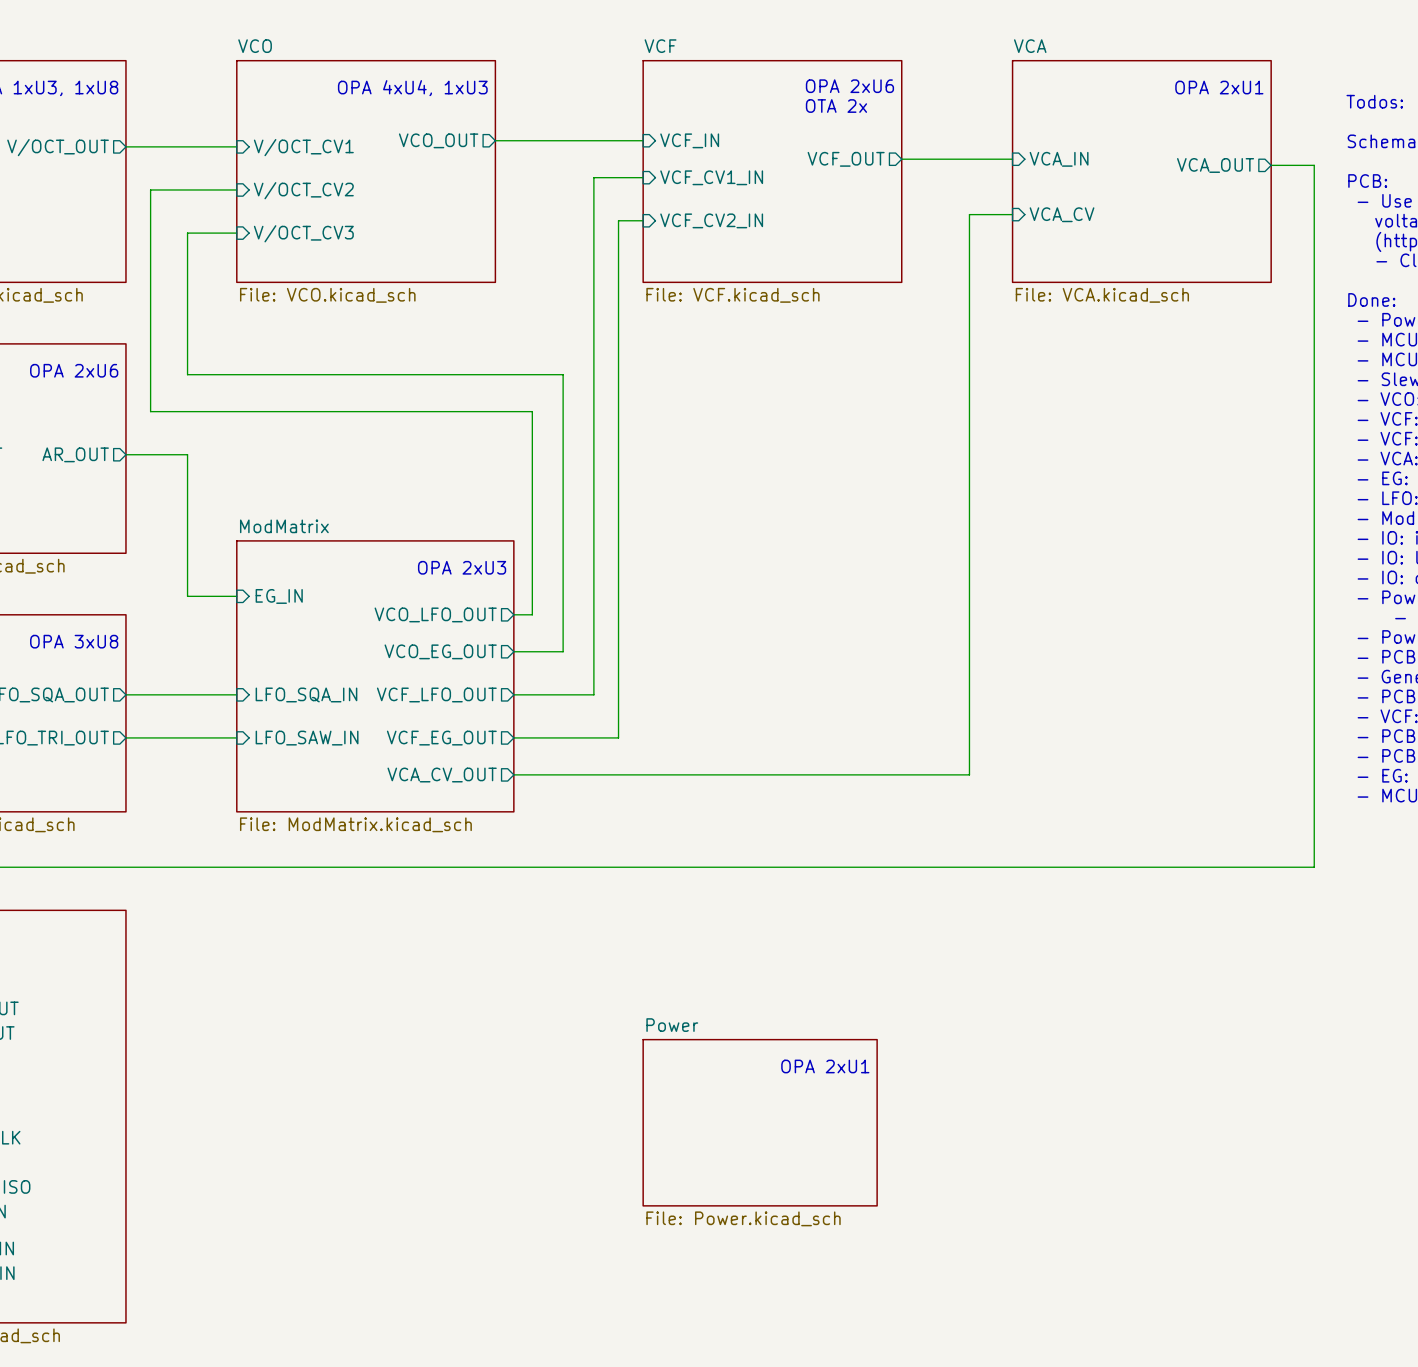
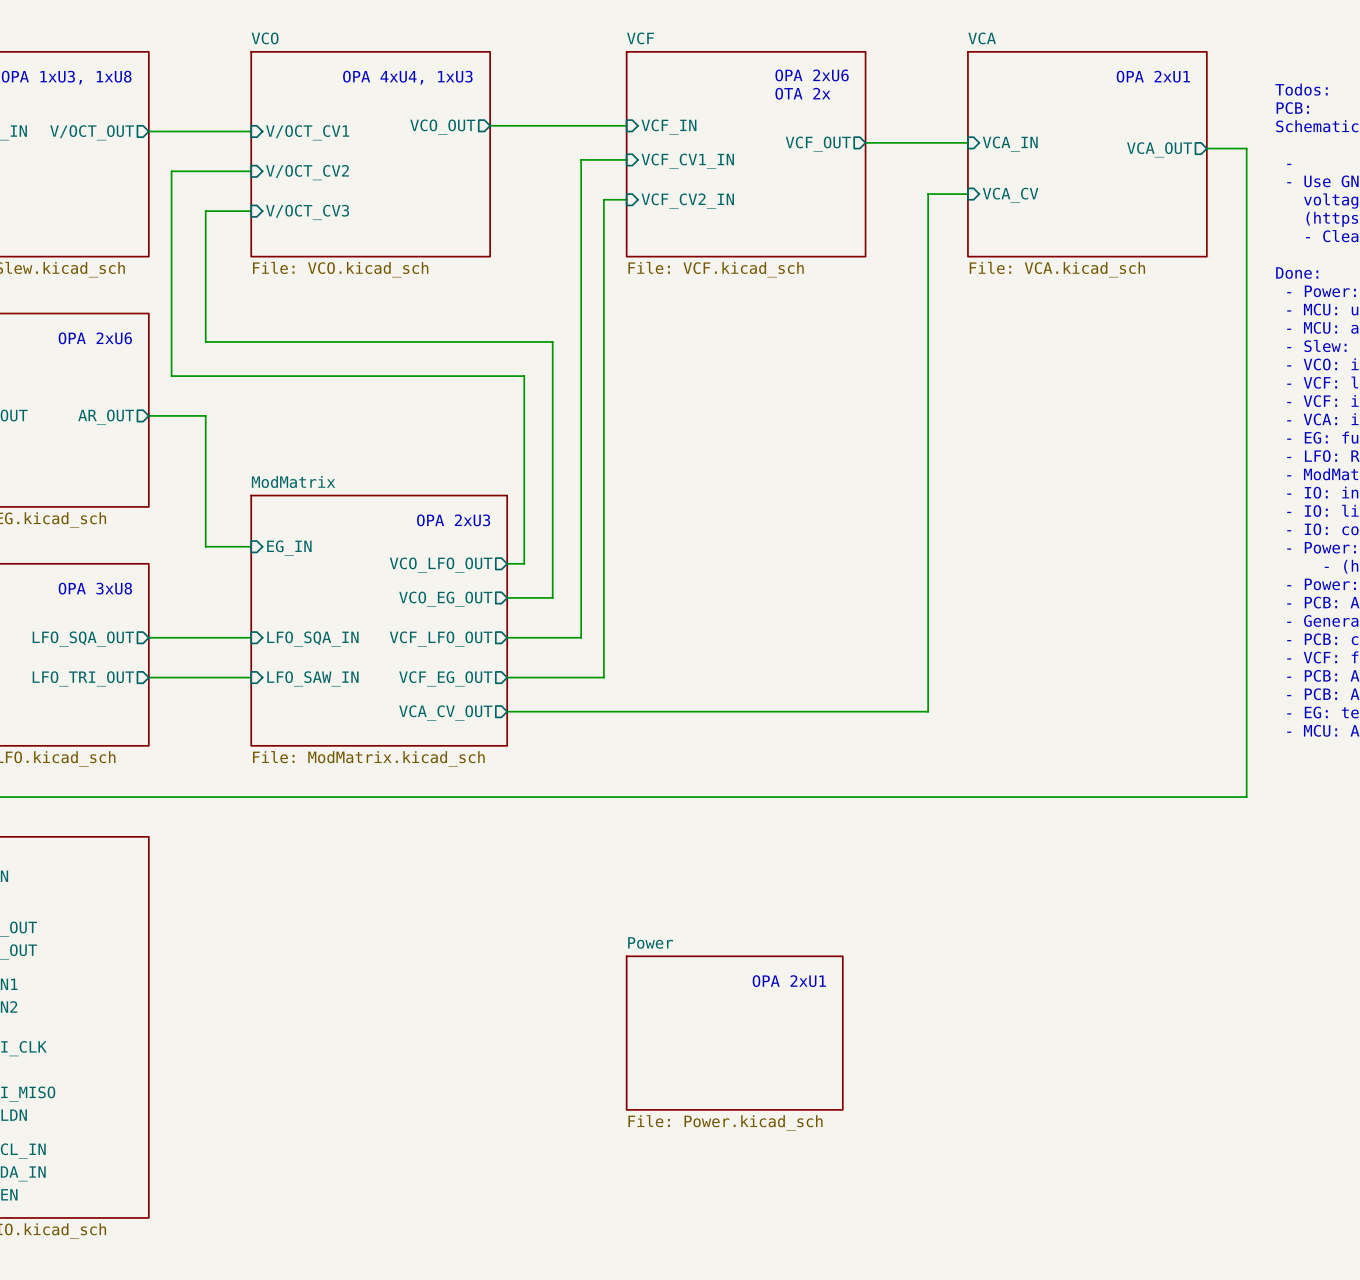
text: none -> PCB: (1292, 108)
text: PCB: (1367, 181) -> - (1289, 164)

